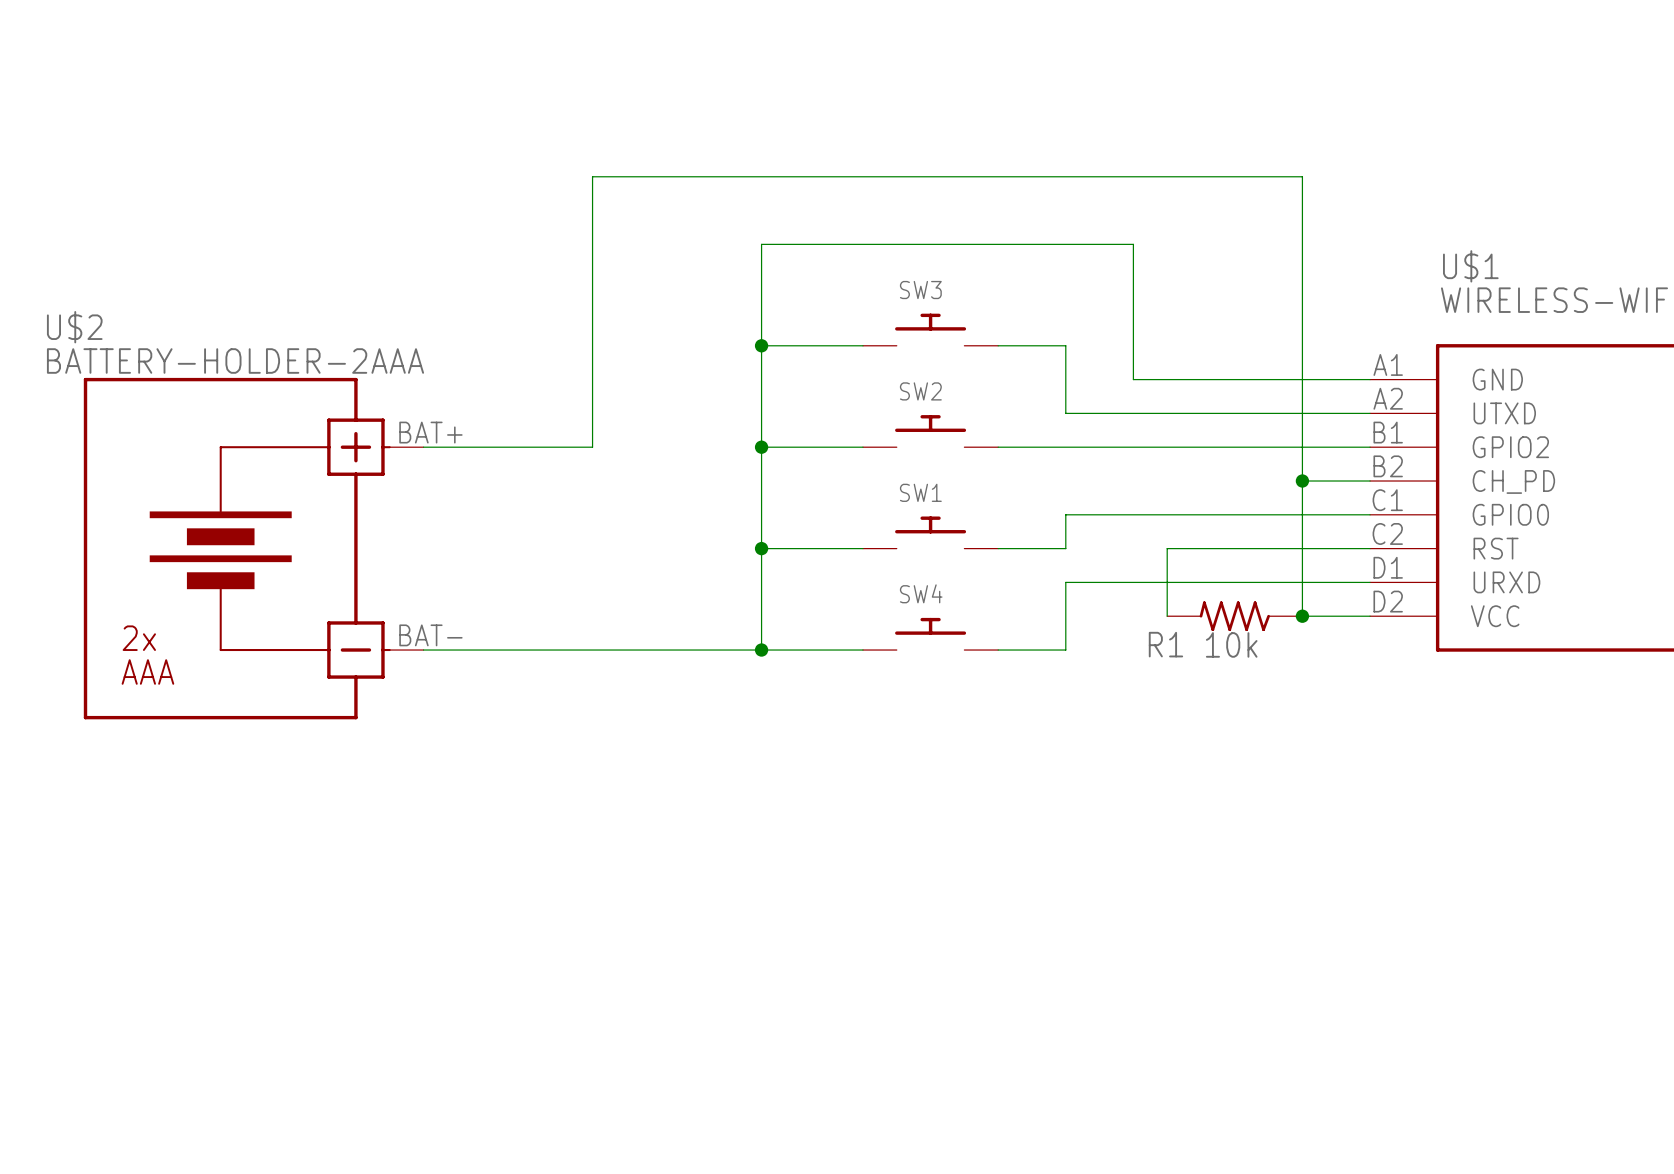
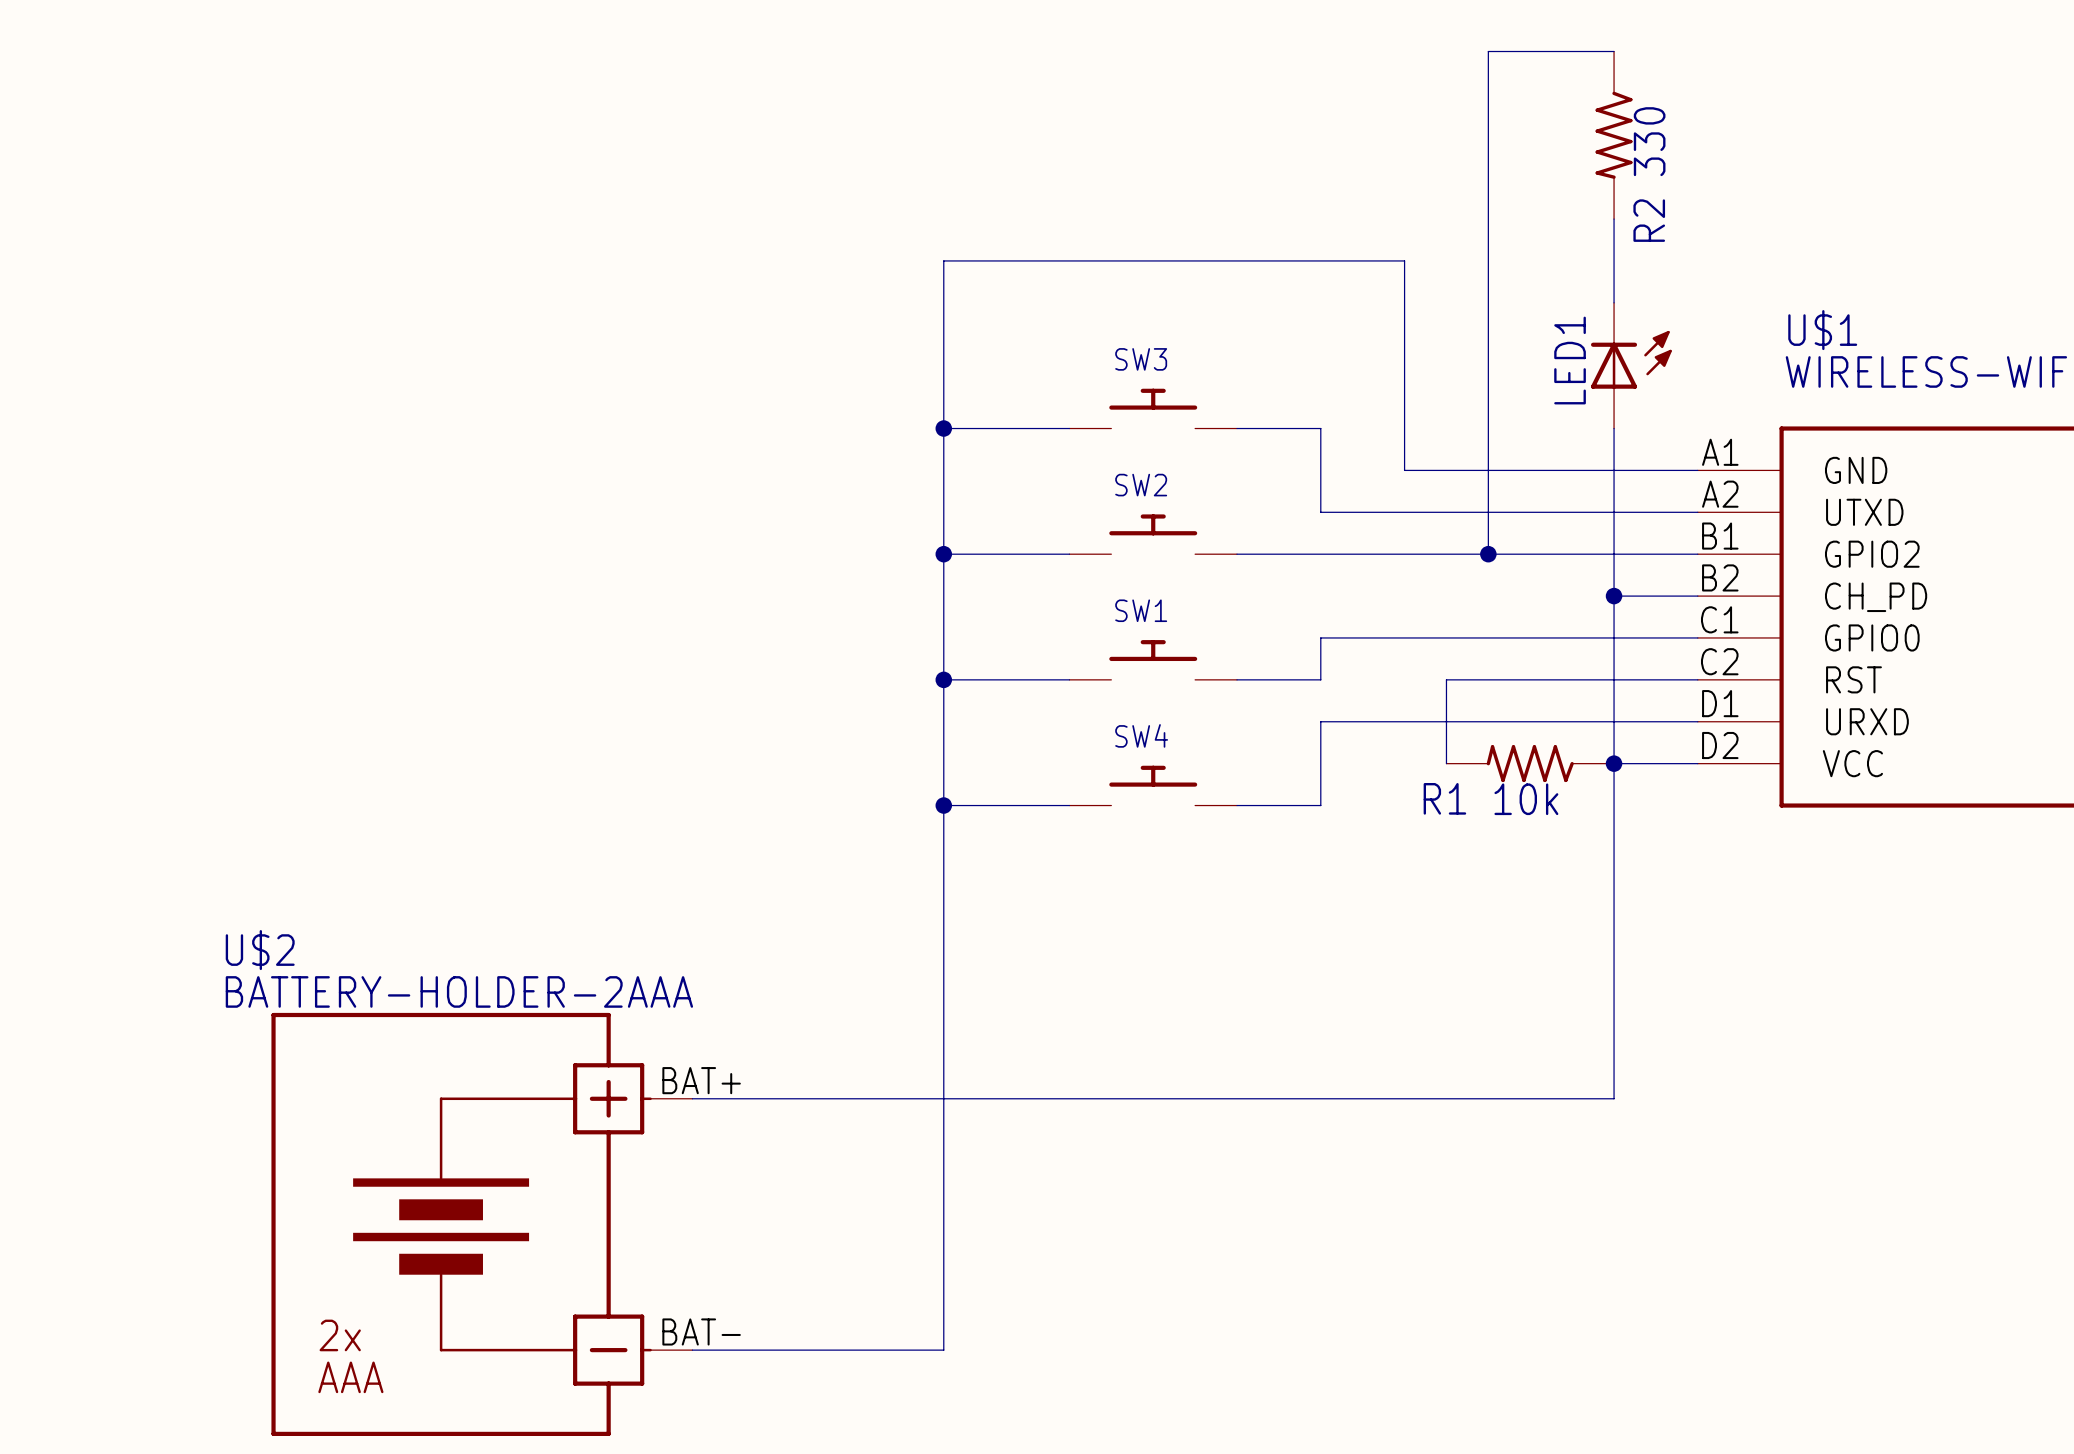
wire: none -> (1614, 51) (1488, 51) (1488, 554)
R2: none -> 330 (1614, 135)
wire: (1302, 176) (592, 176) (592, 447) (423, 447) -> none
wire: (761, 244) (1133, 244) -> (943, 302) (943, 260) (1404, 260) (1404, 302)
LED1: none -> (1631, 365)
junction: none -> (1488, 554)
U$2 position: (253, 548) -> (481, 1224)
wire: none -> (1614, 763) (1614, 1098) (692, 1098)
wire: (423, 650) (761, 650) -> (692, 1350) (943, 1350) (943, 805)

